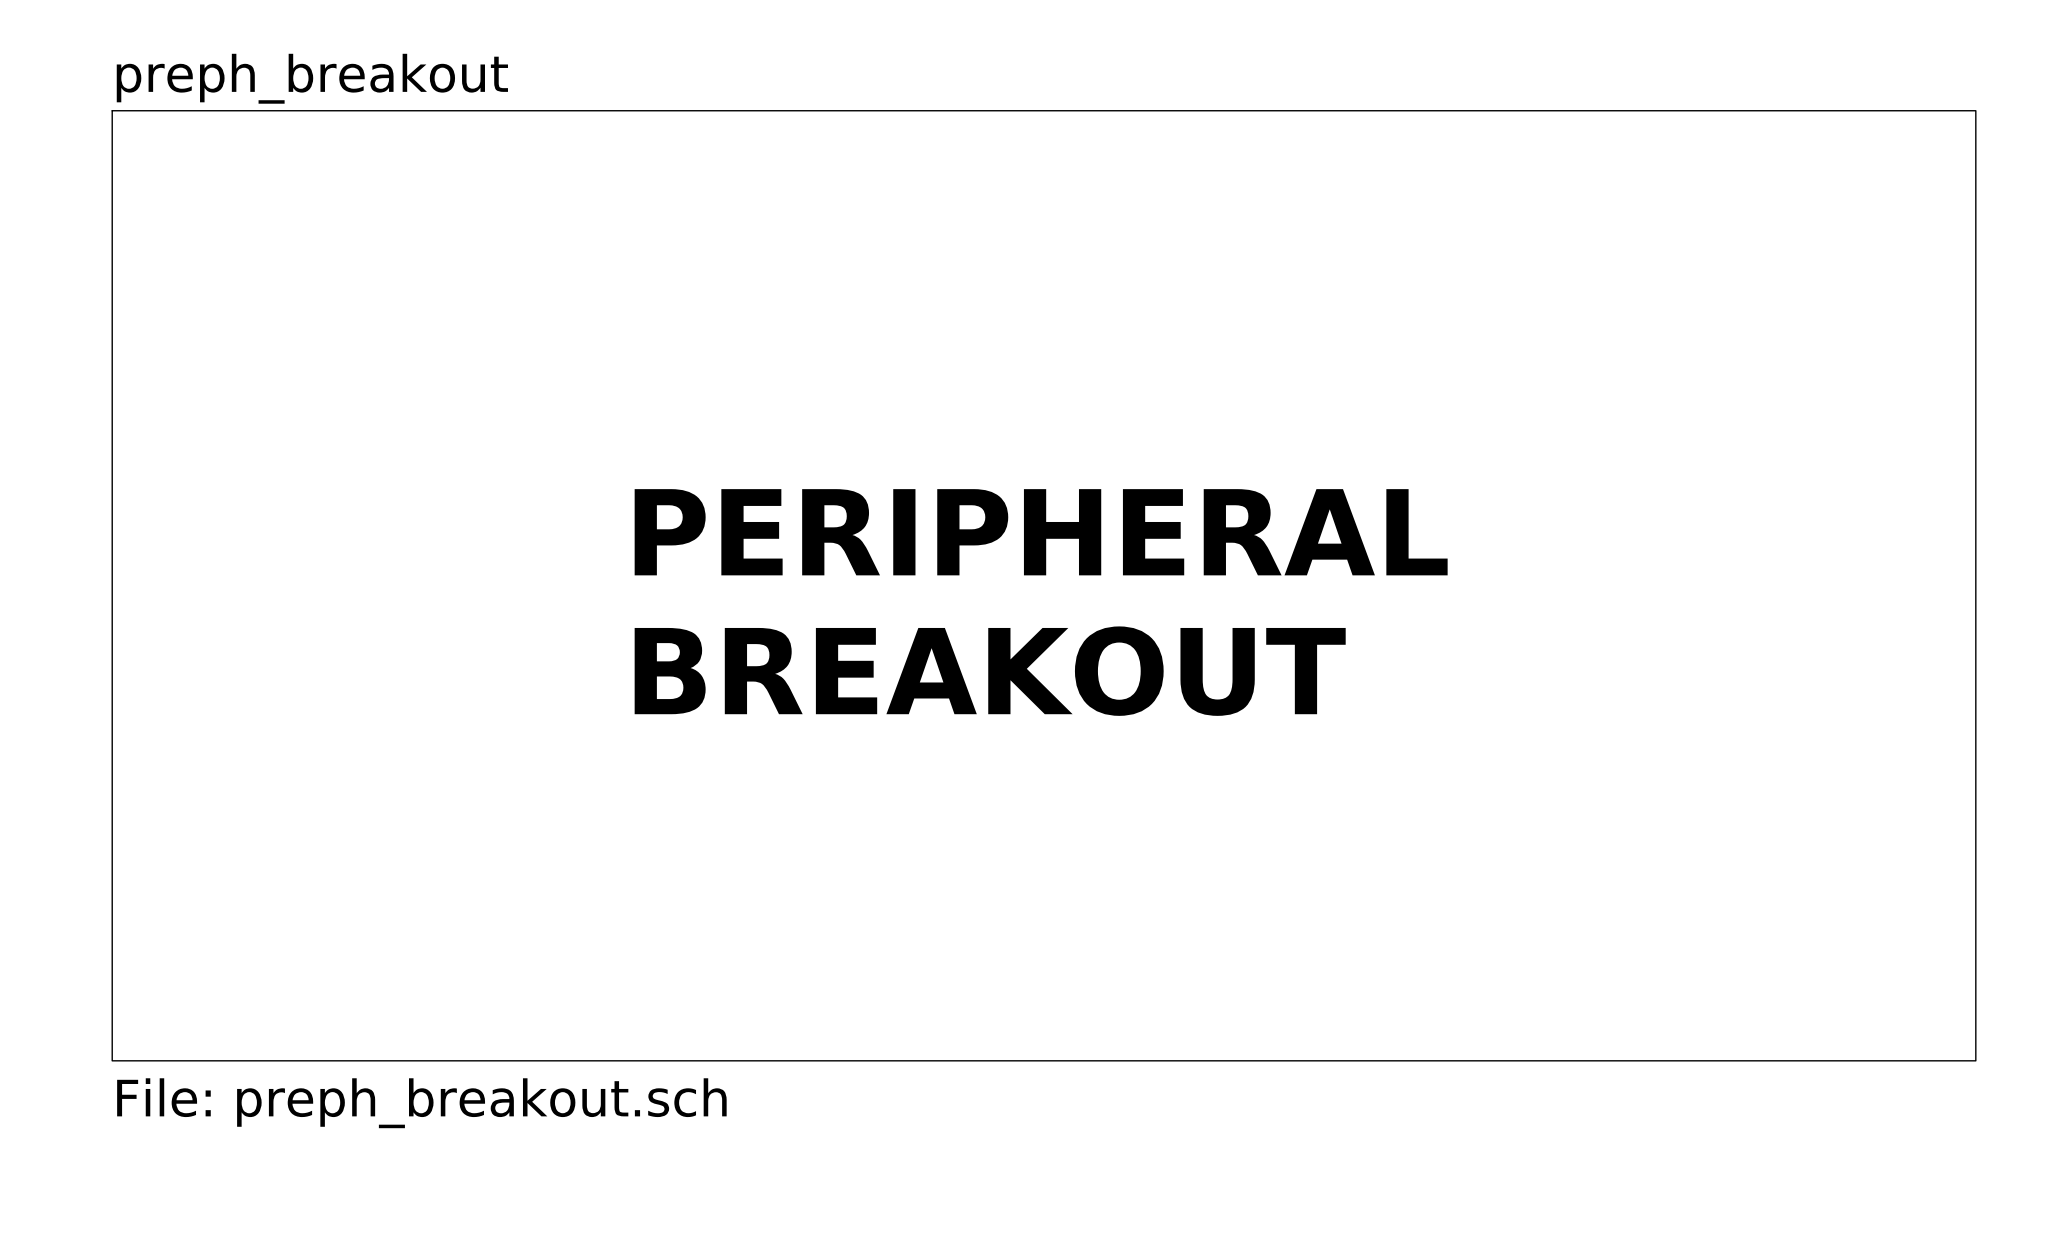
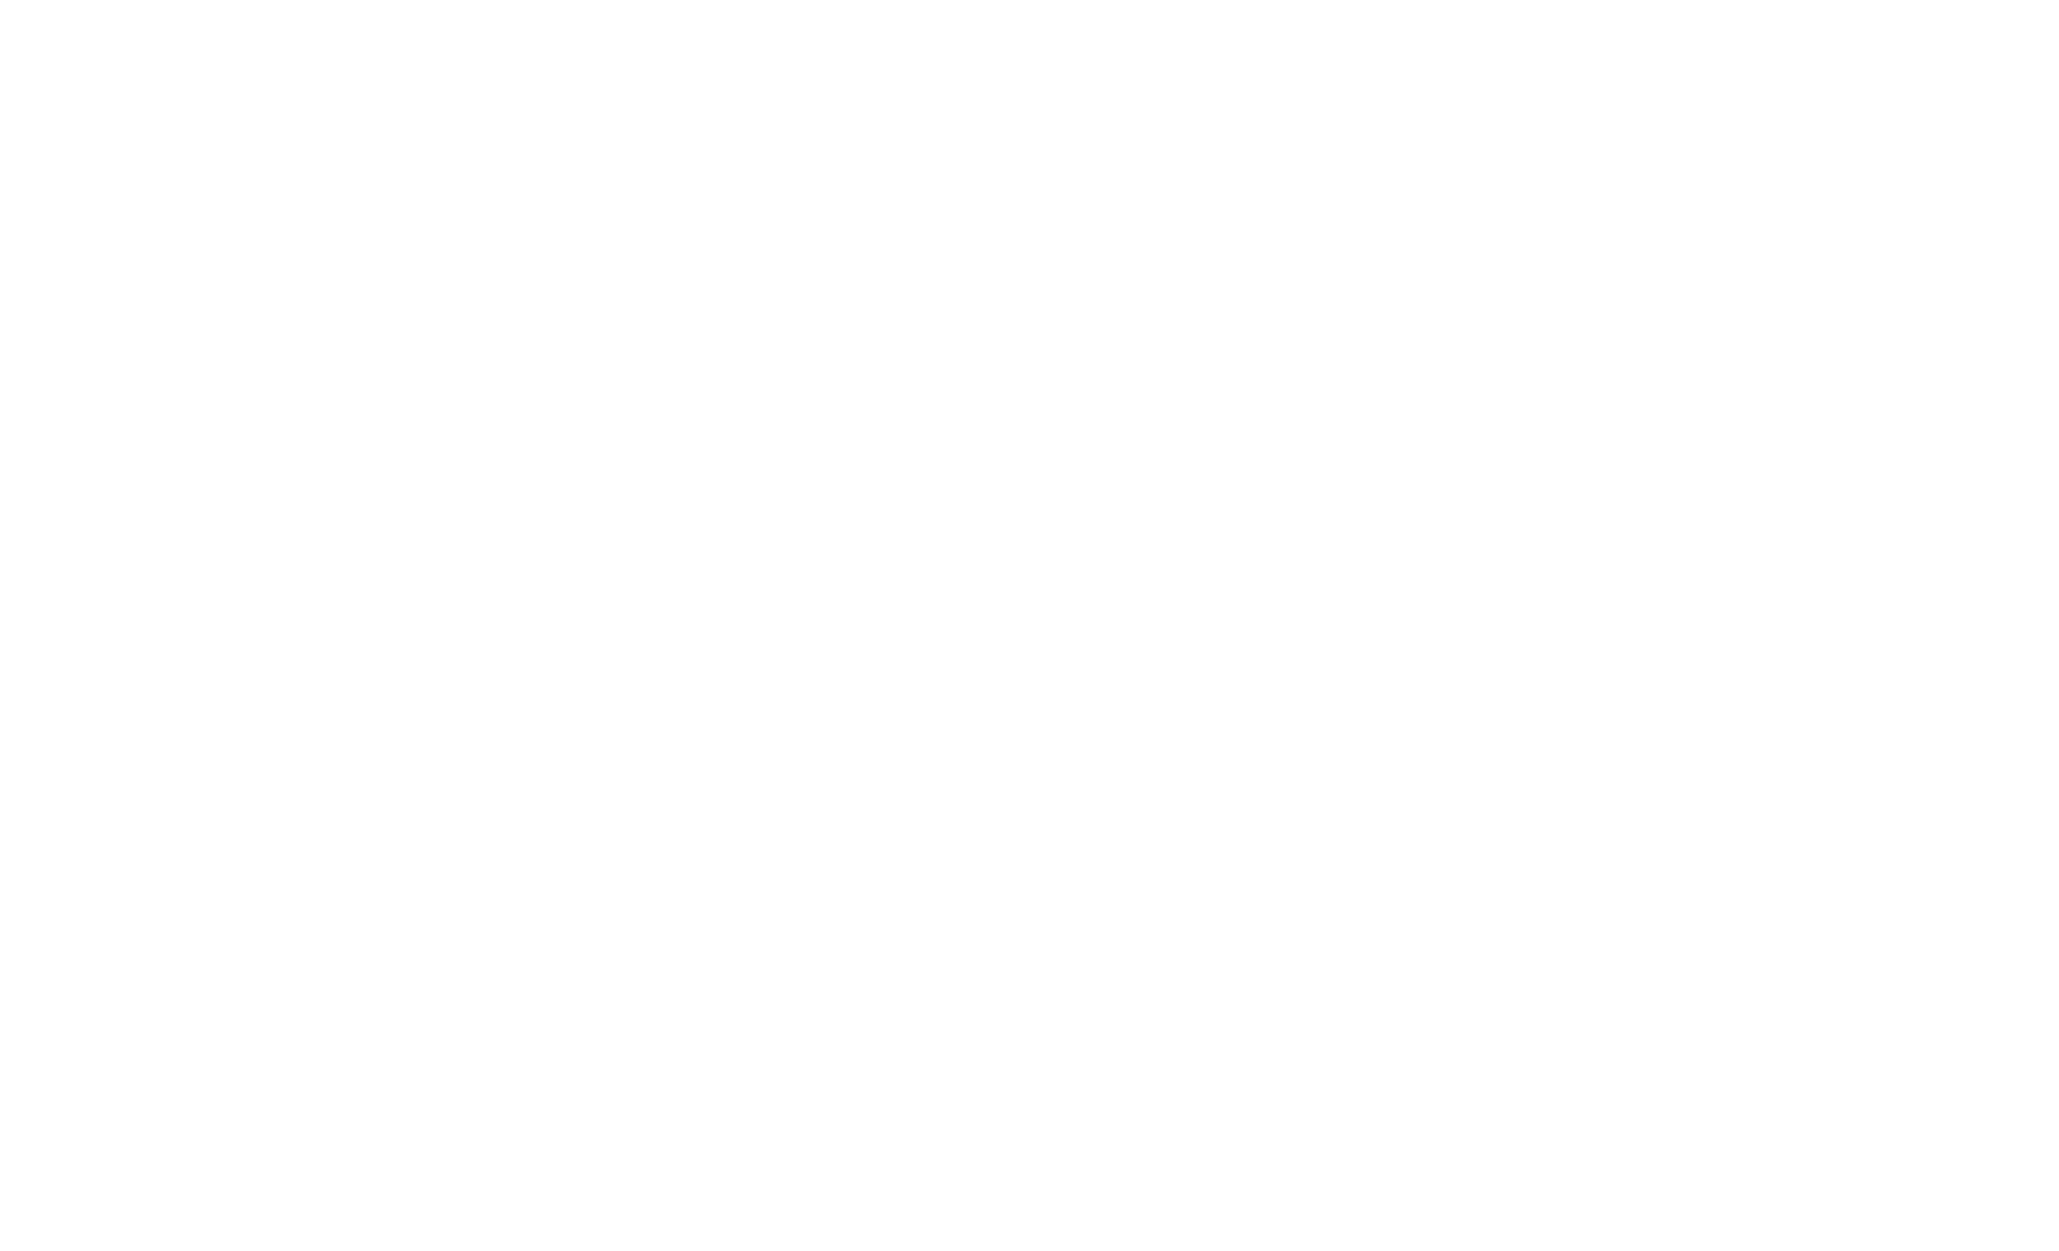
text: PERIPHERAL (1041, 532) -> none
sheet preph_breakout: File: preph_breakout.sch (1044, 585) -> none
text: BREAKOUT (990, 671) -> none

